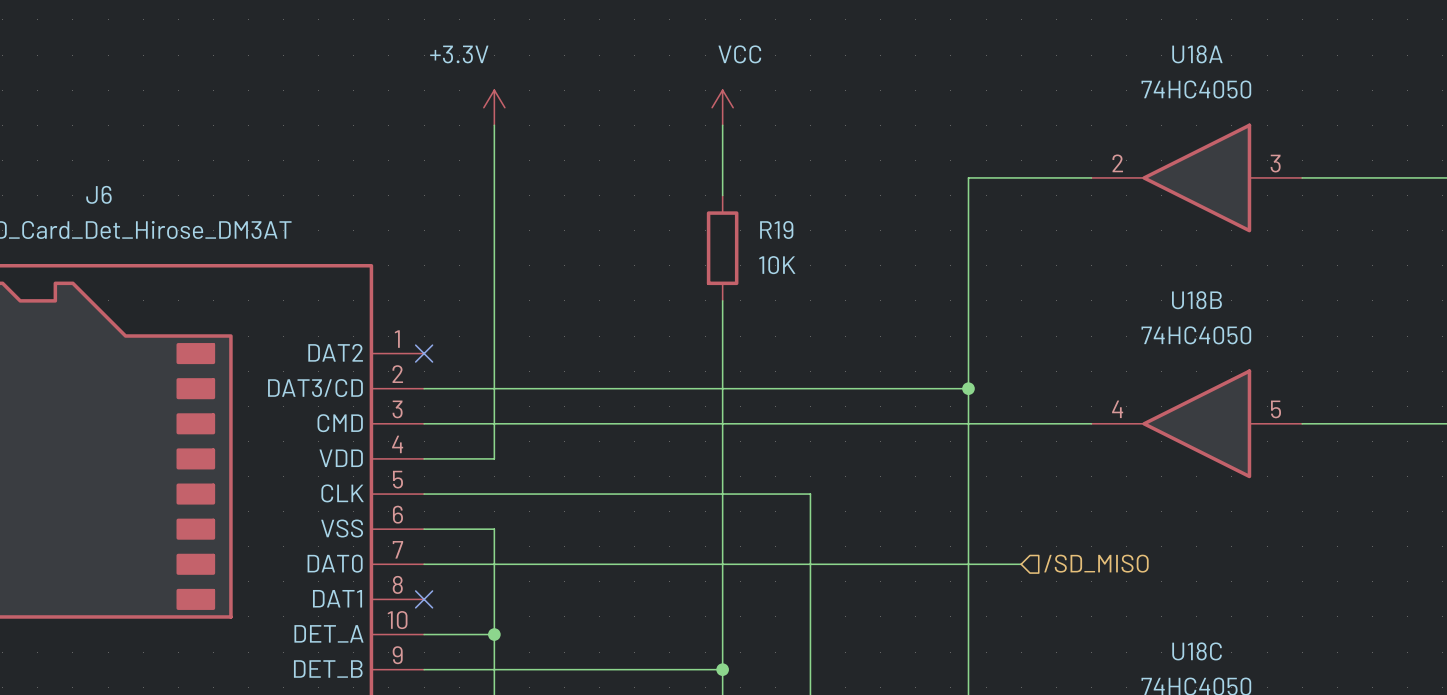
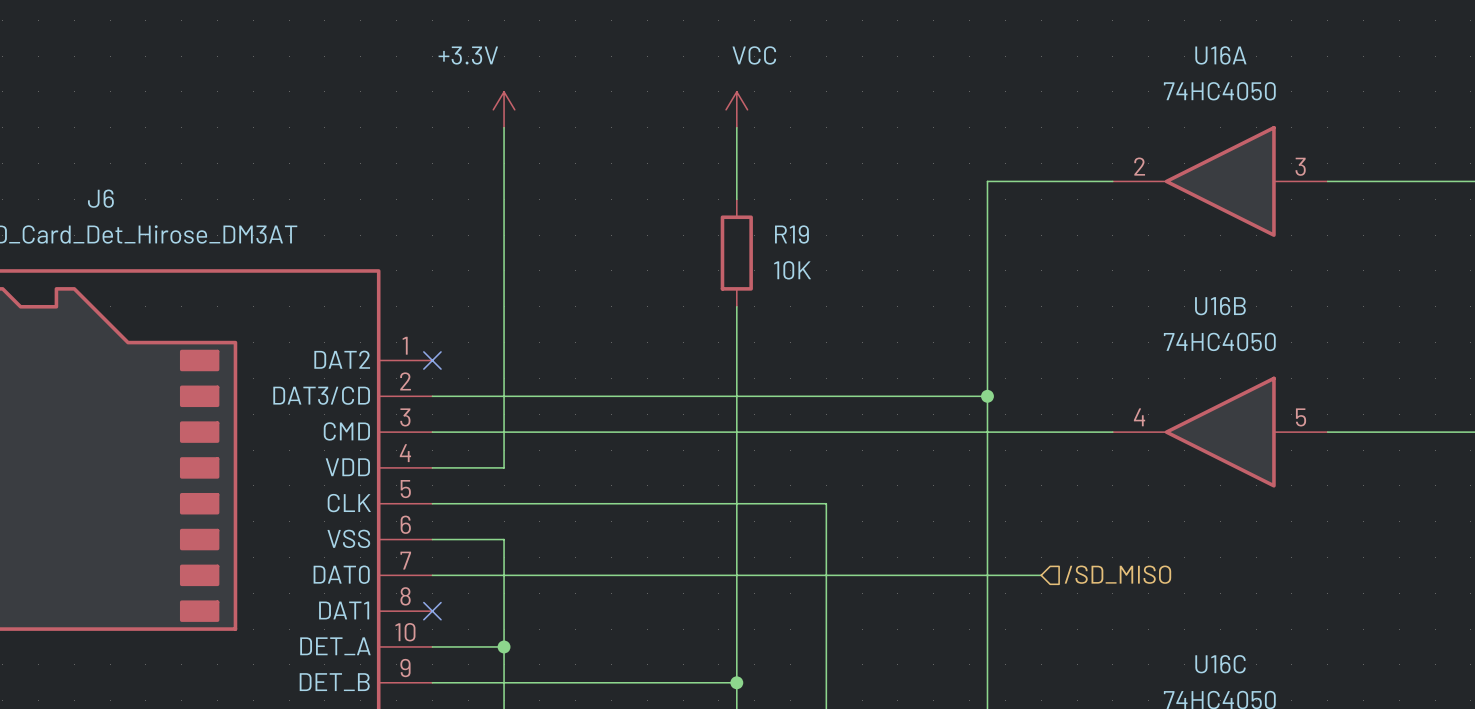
U18A name: U18A (1197, 54) -> U16A (1220, 55)
U18B name: U18B (1196, 300) -> U16B (1220, 306)
U18C name: U18C (1197, 651) -> U16C (1220, 664)

